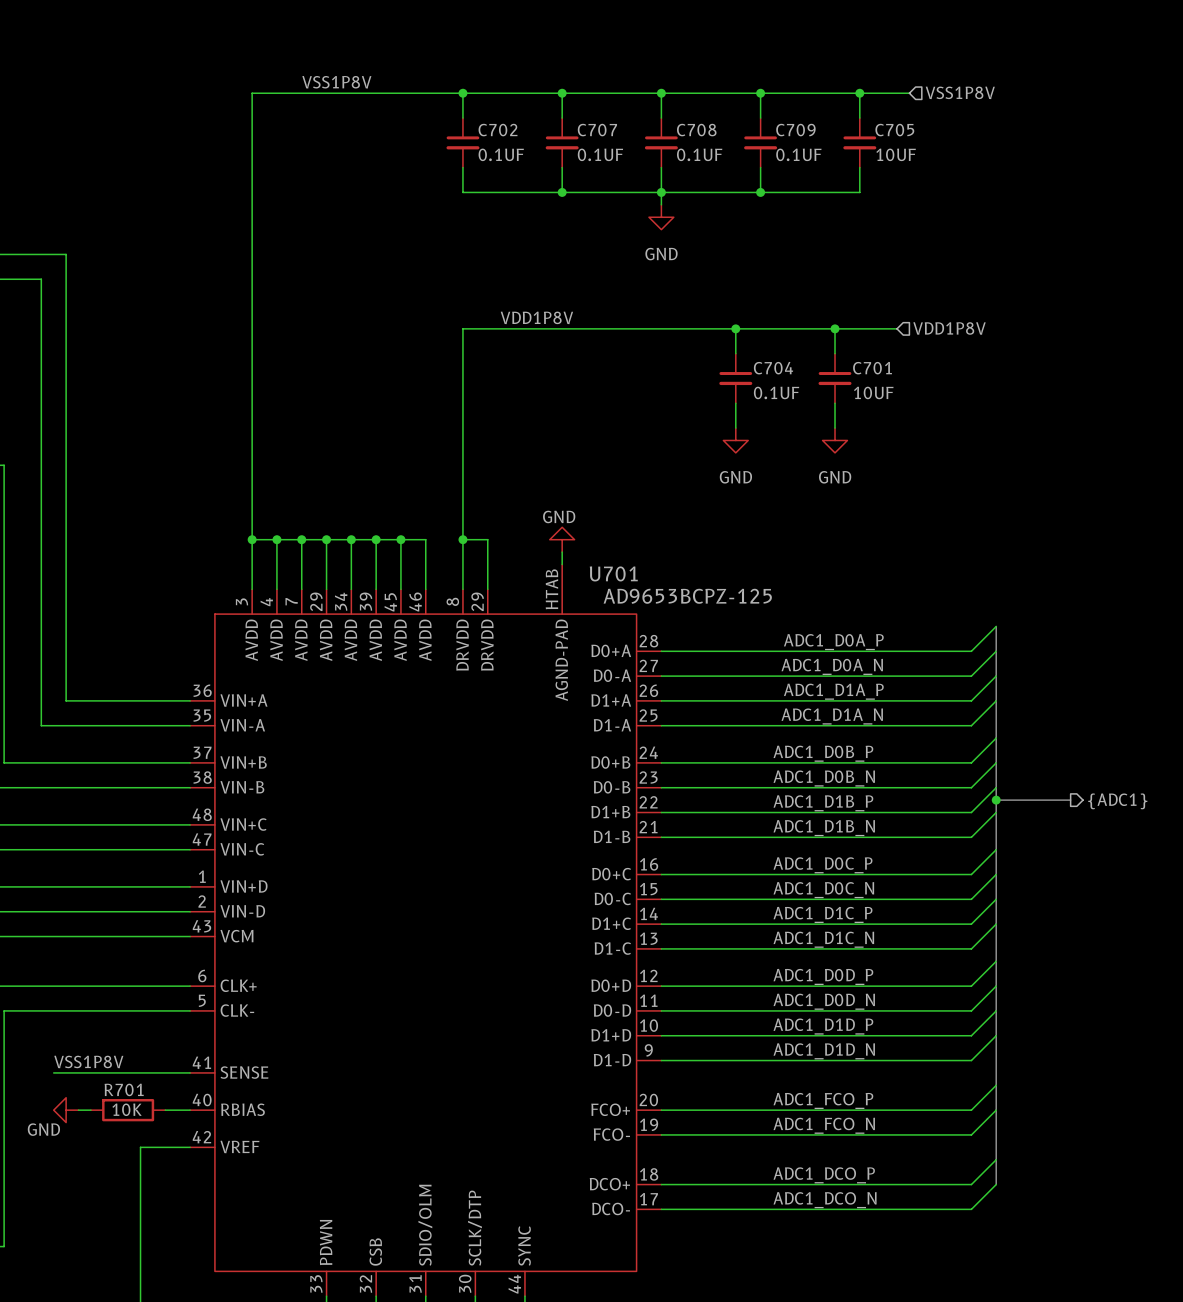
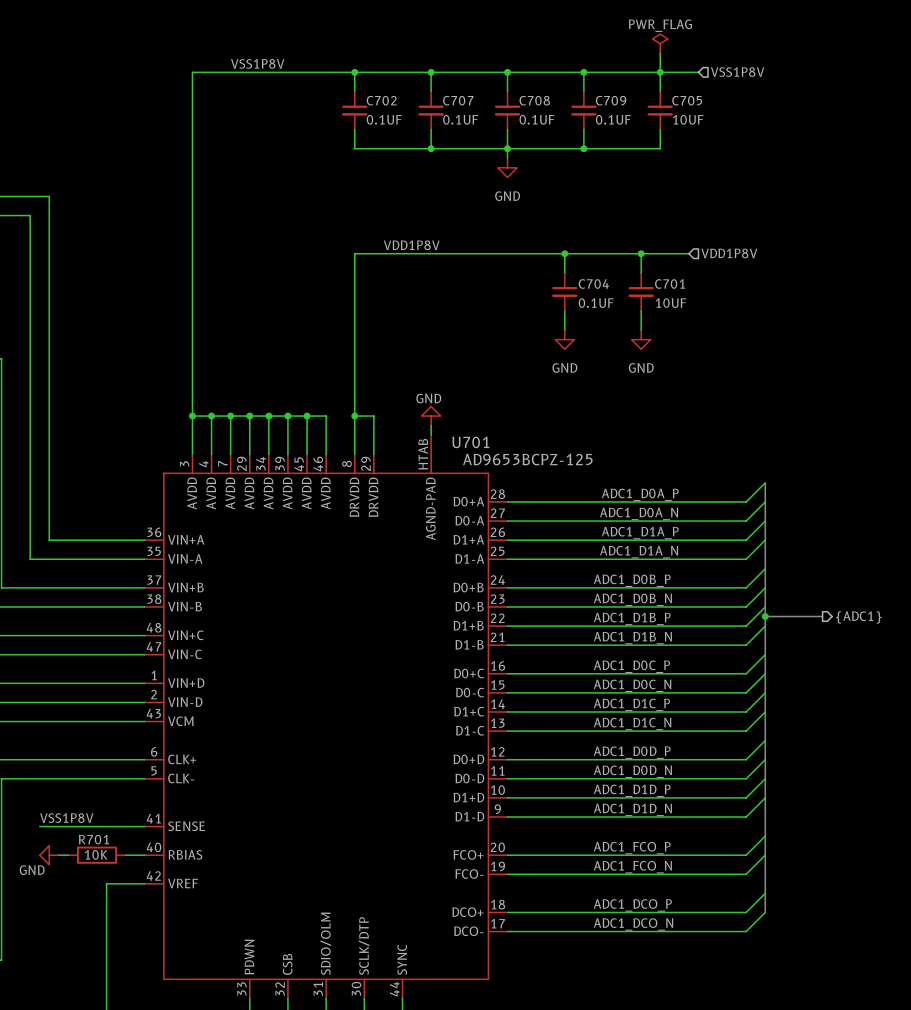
power symbol: none -> PWR_FLAG (660, 43)
wire: none -> (660, 53) (660, 72)

